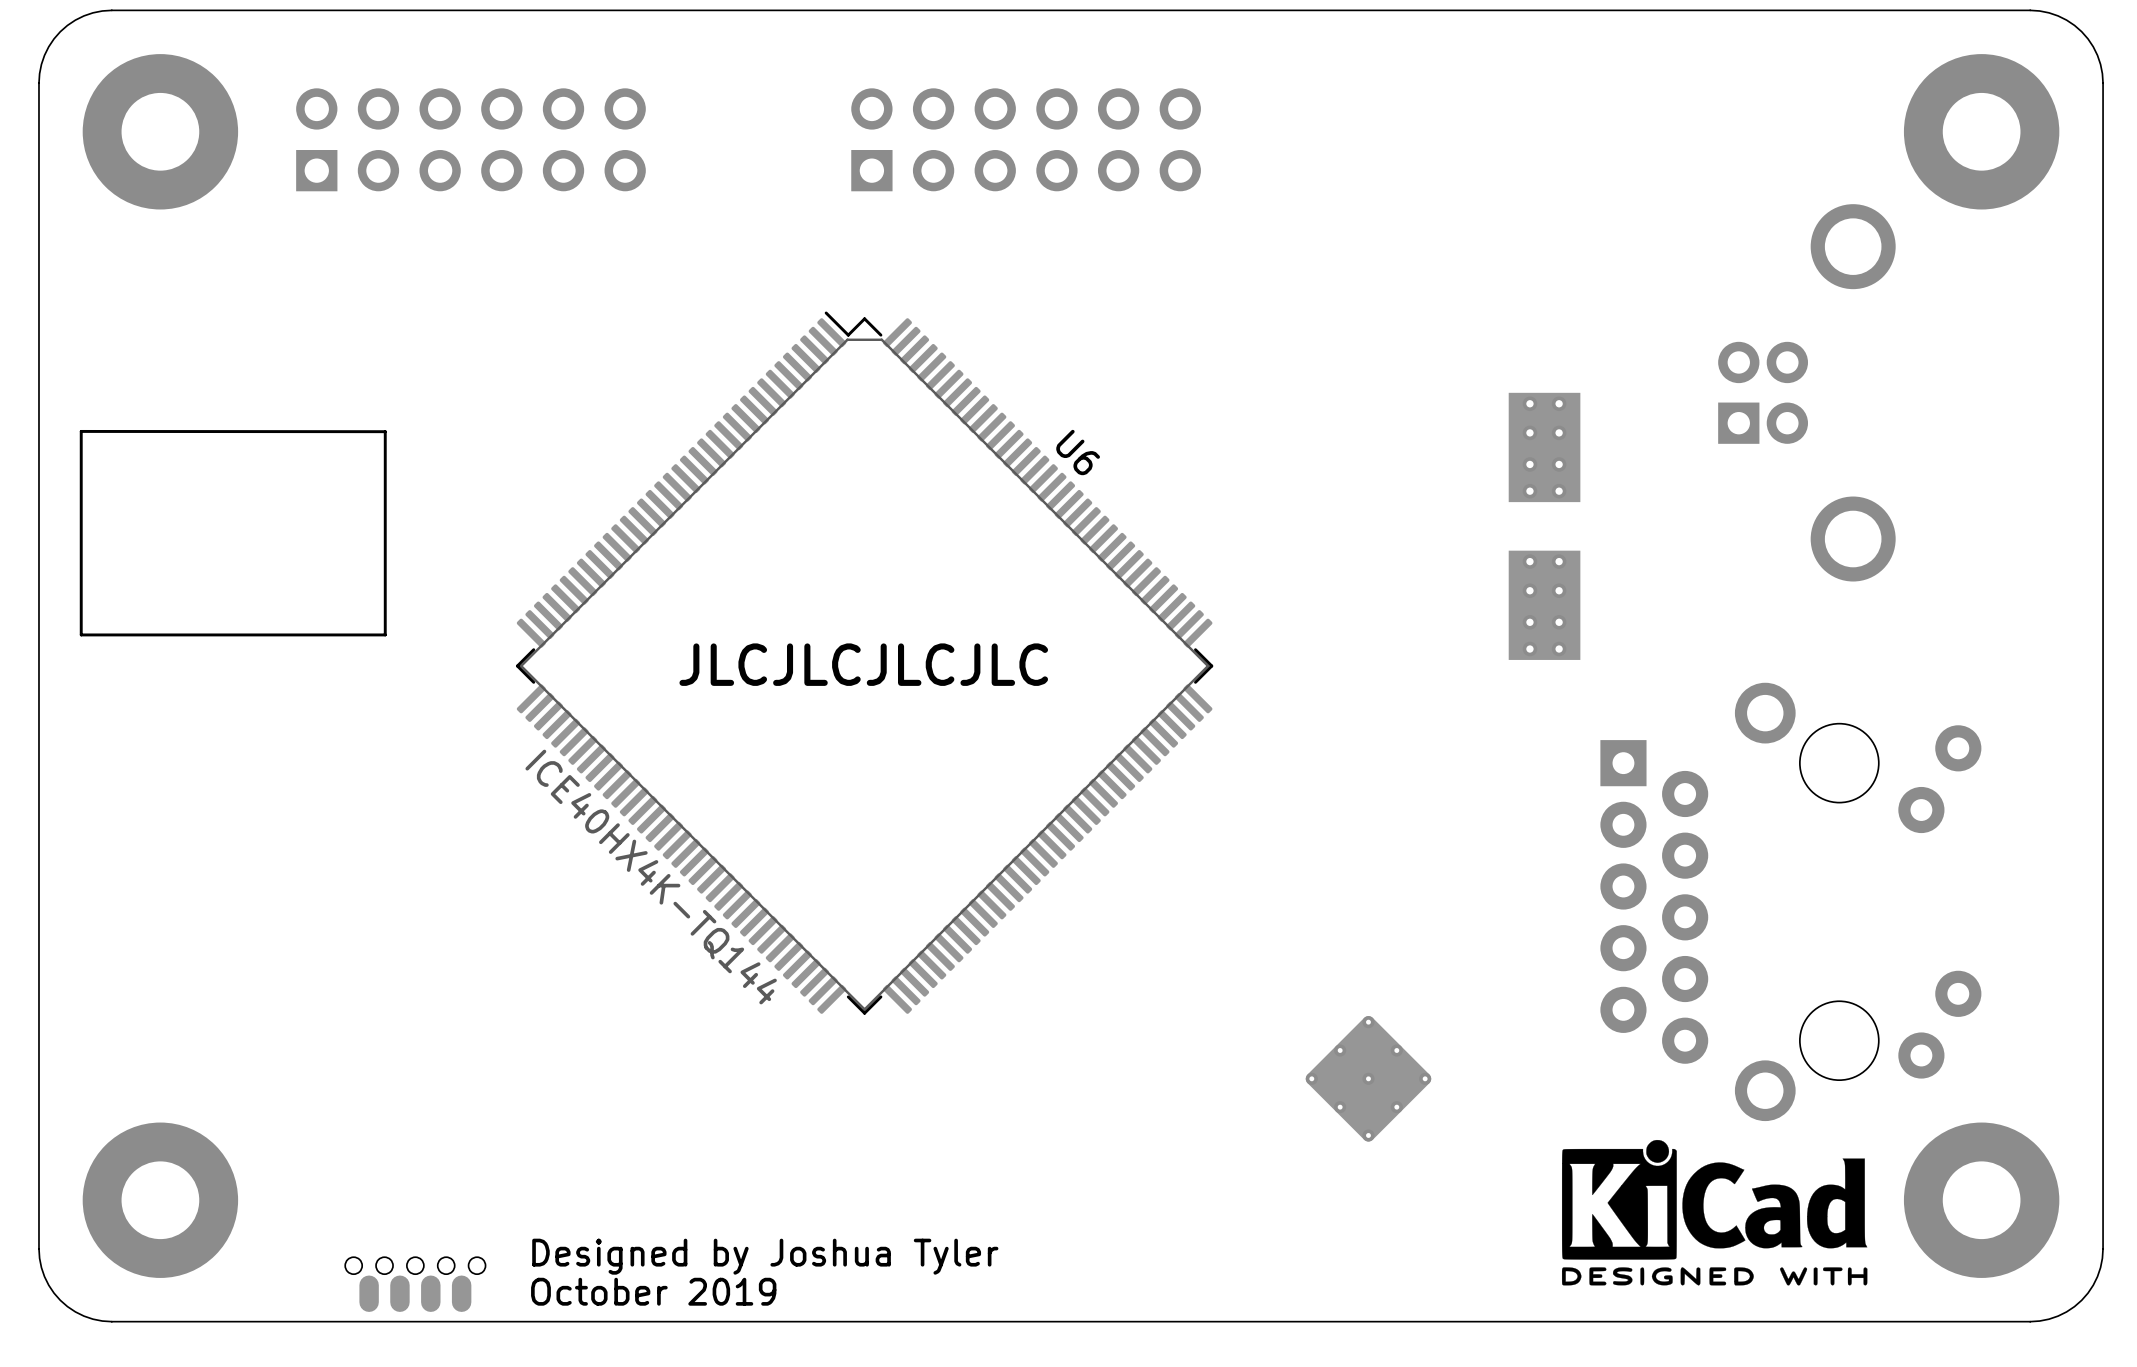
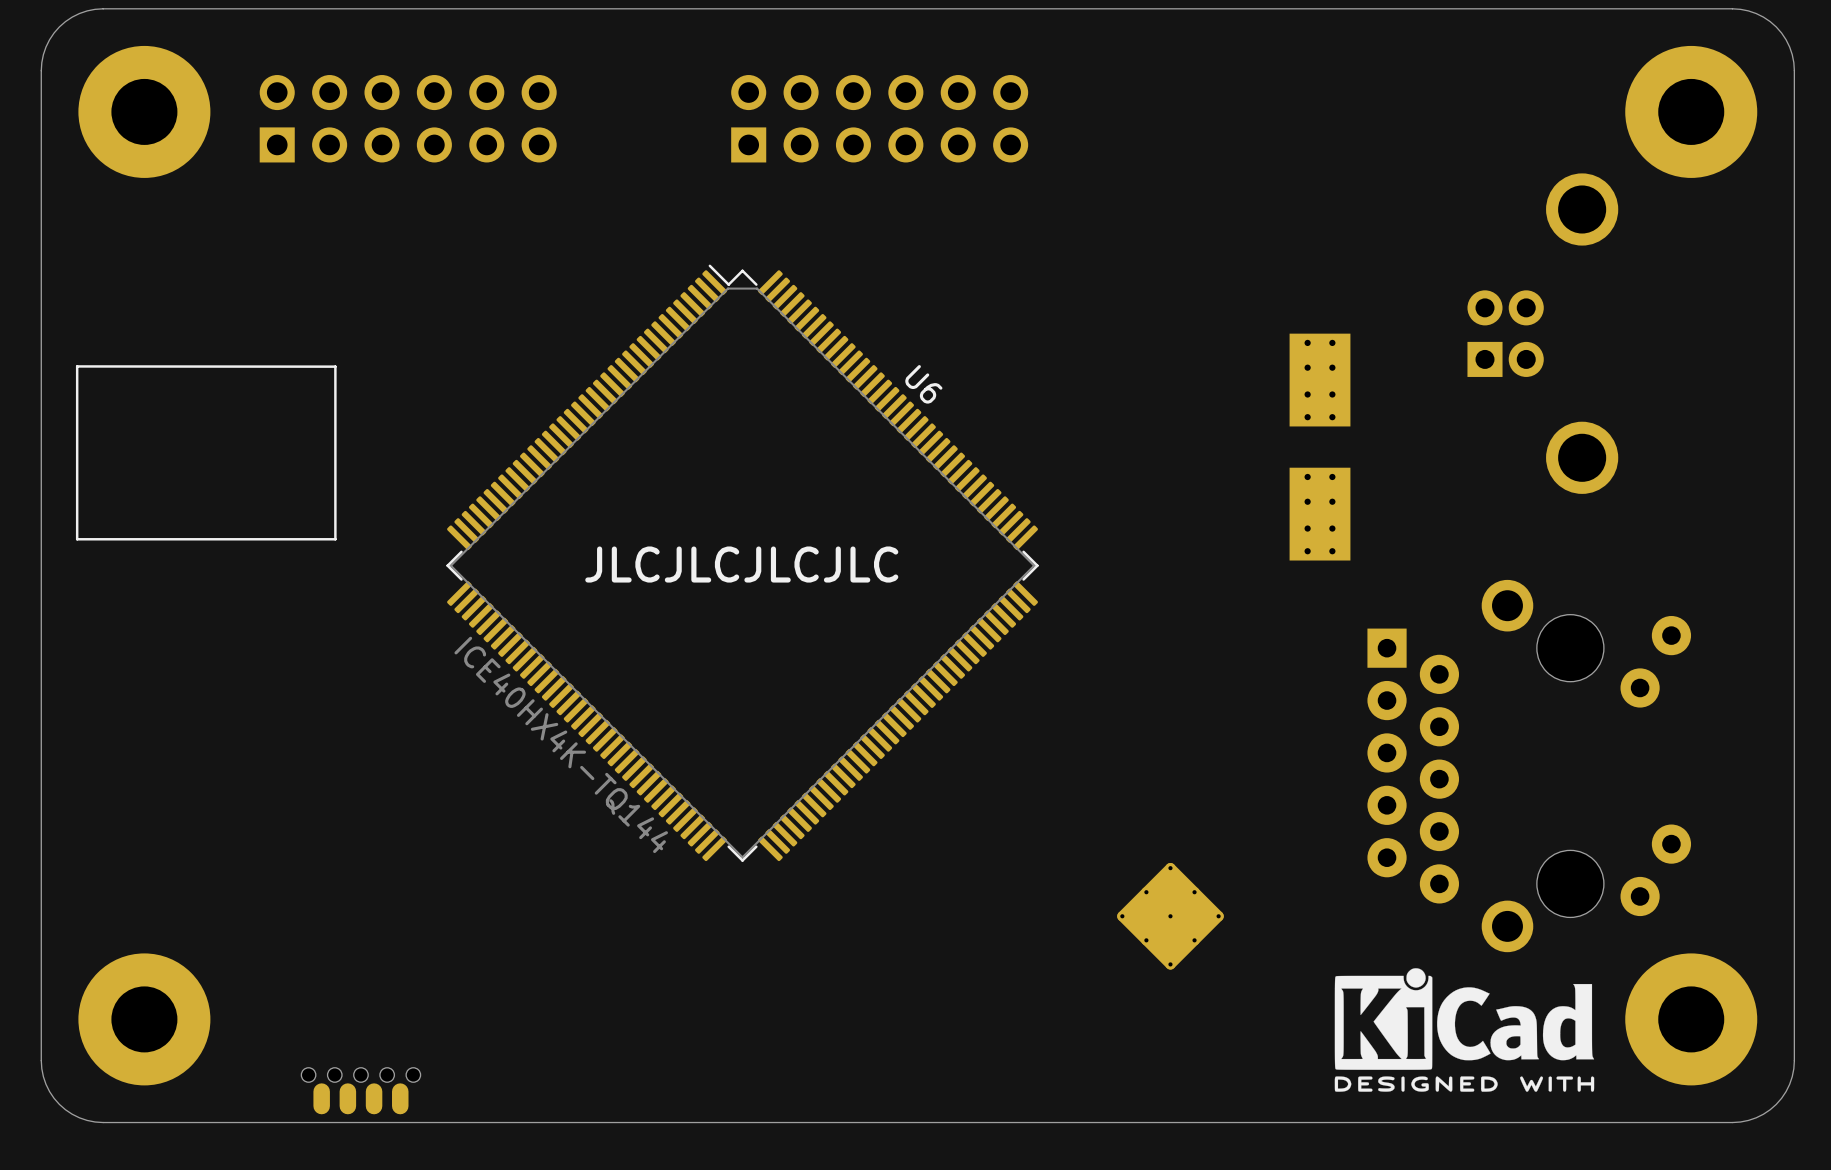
text: Designed by Joshua Tyler (765, 1256) -> none
text: October 2019 (653, 1291) -> none

